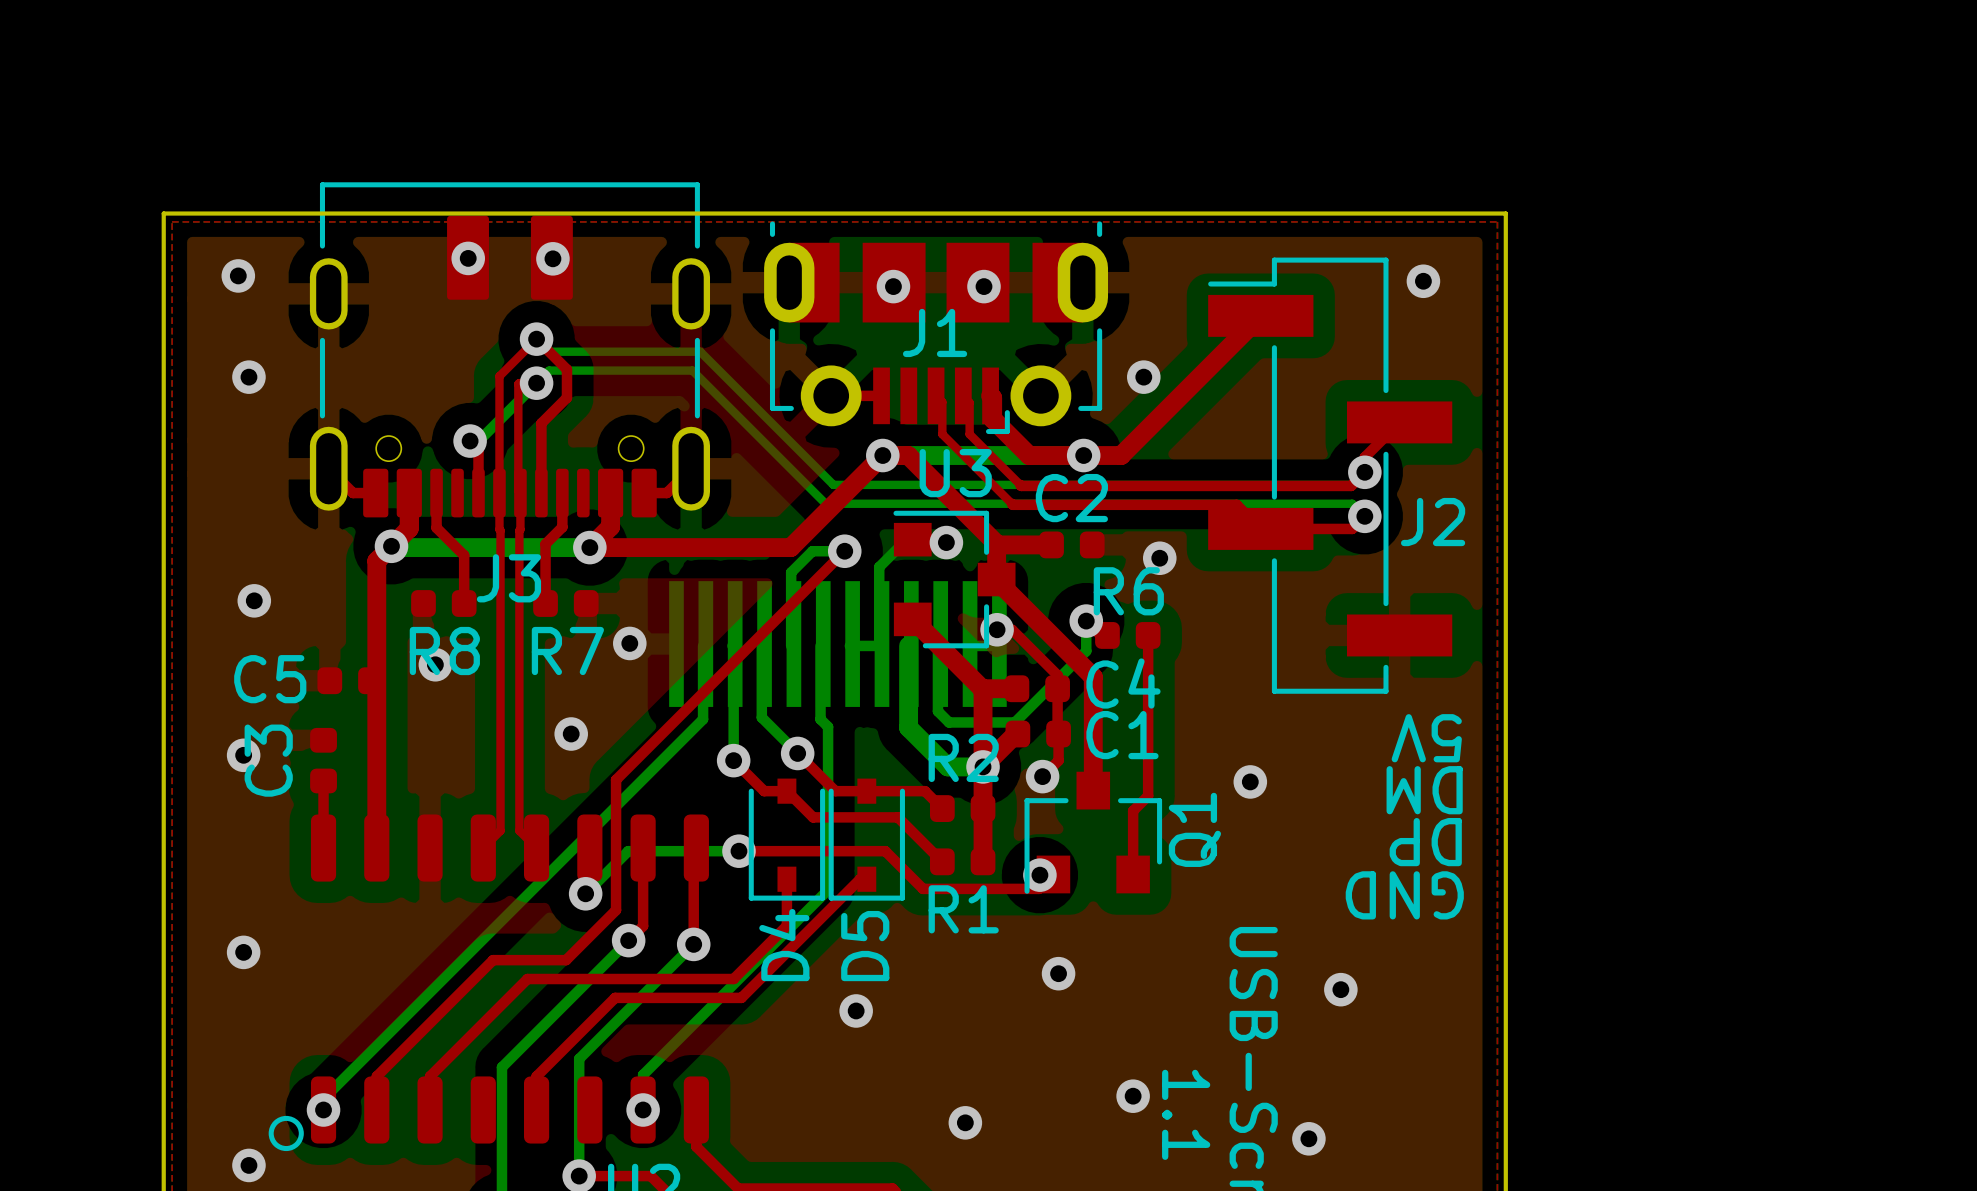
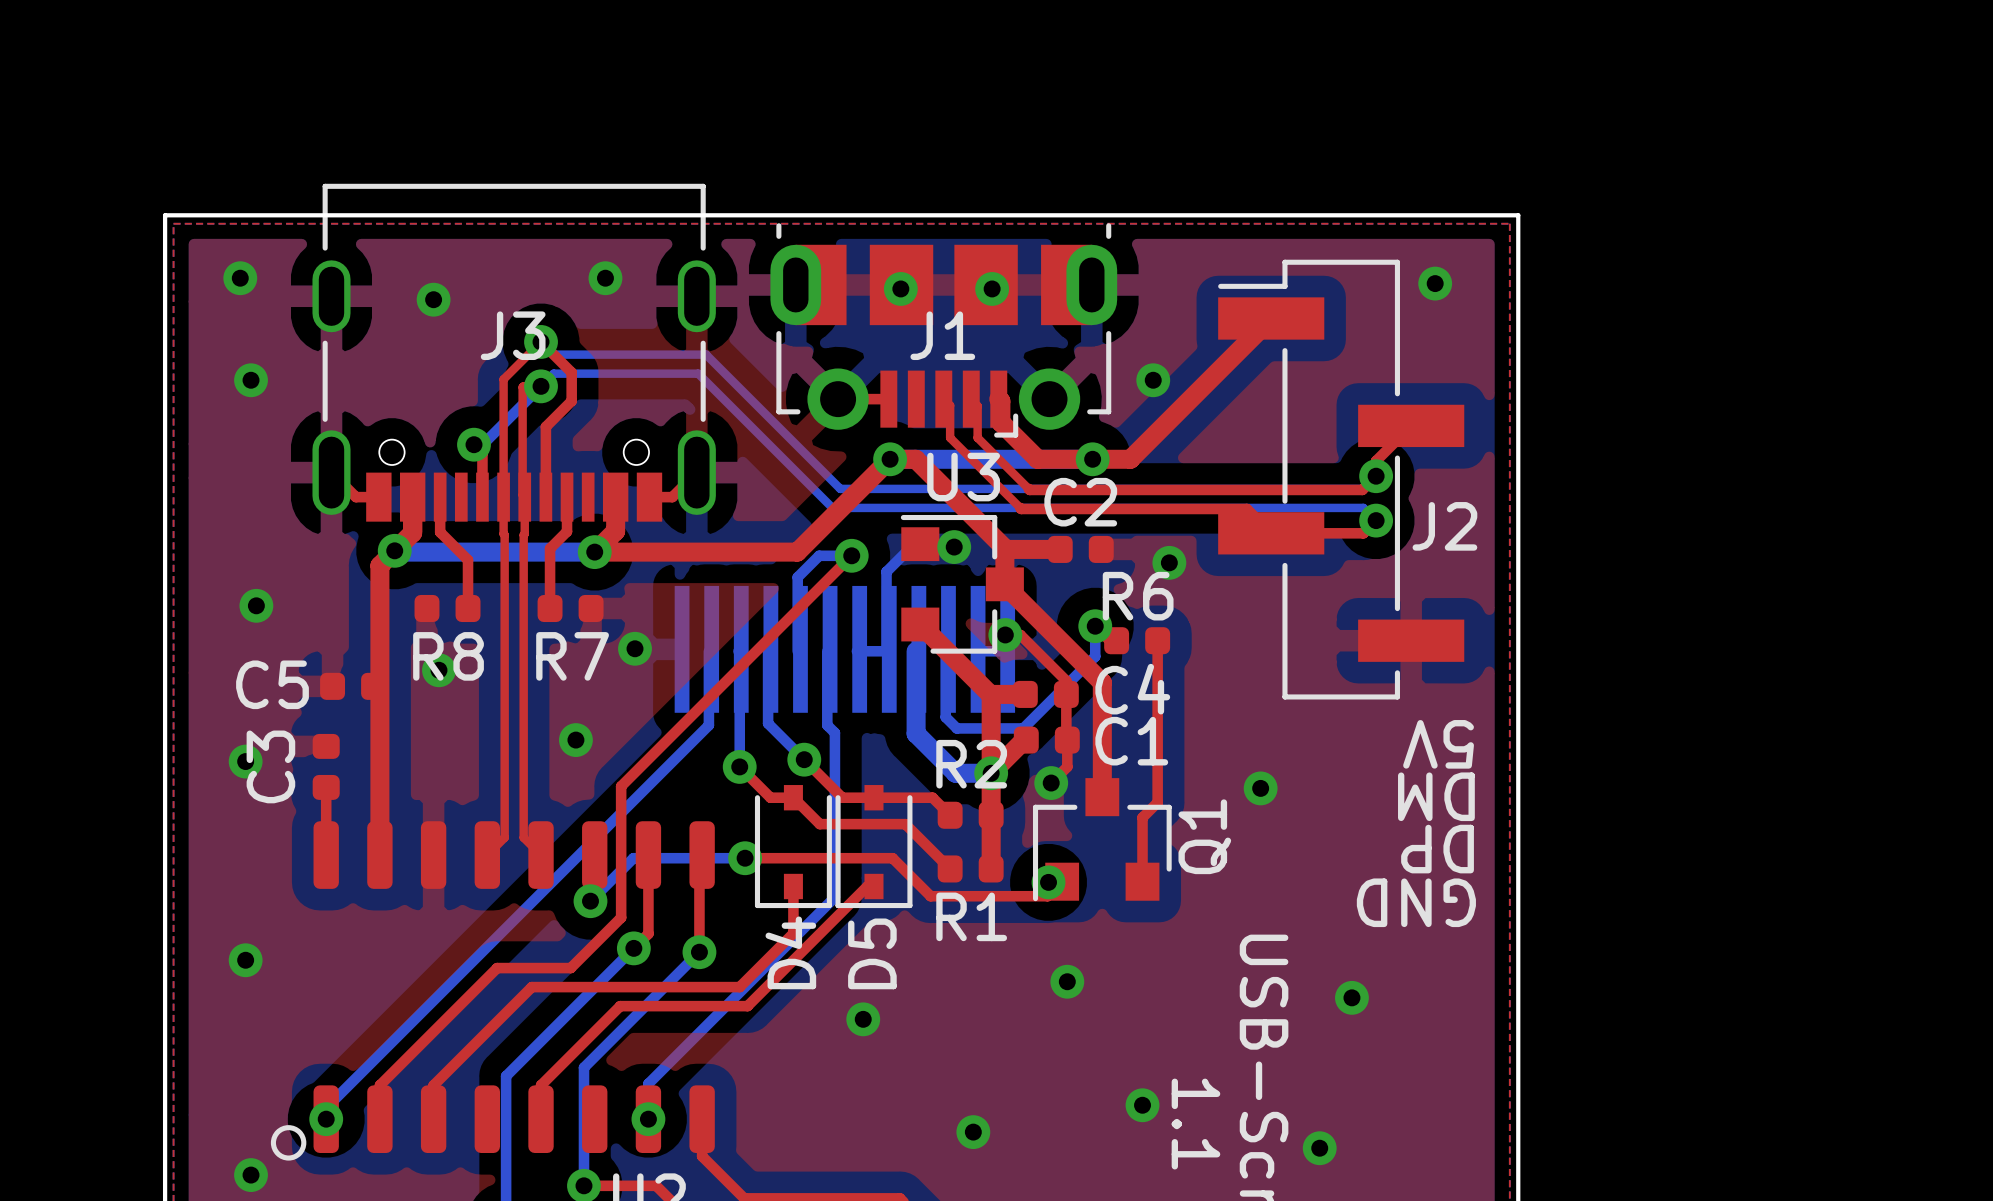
J3 footprint: [309, 182, 711, 518] -> [312, 183, 716, 522]
via position: (468, 258) -> (433, 299)
via position: (552, 258) -> (605, 278)
J3 name position: J3 (508, 578) -> J3 (513, 335)

